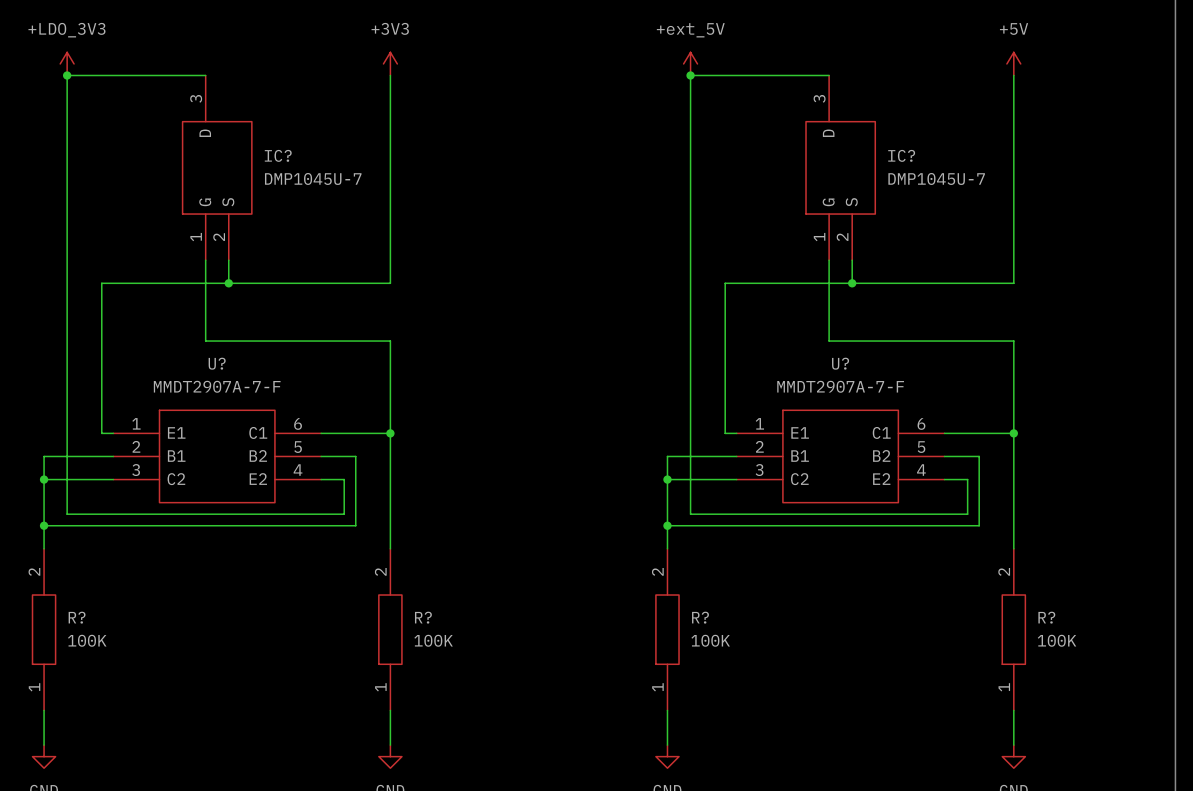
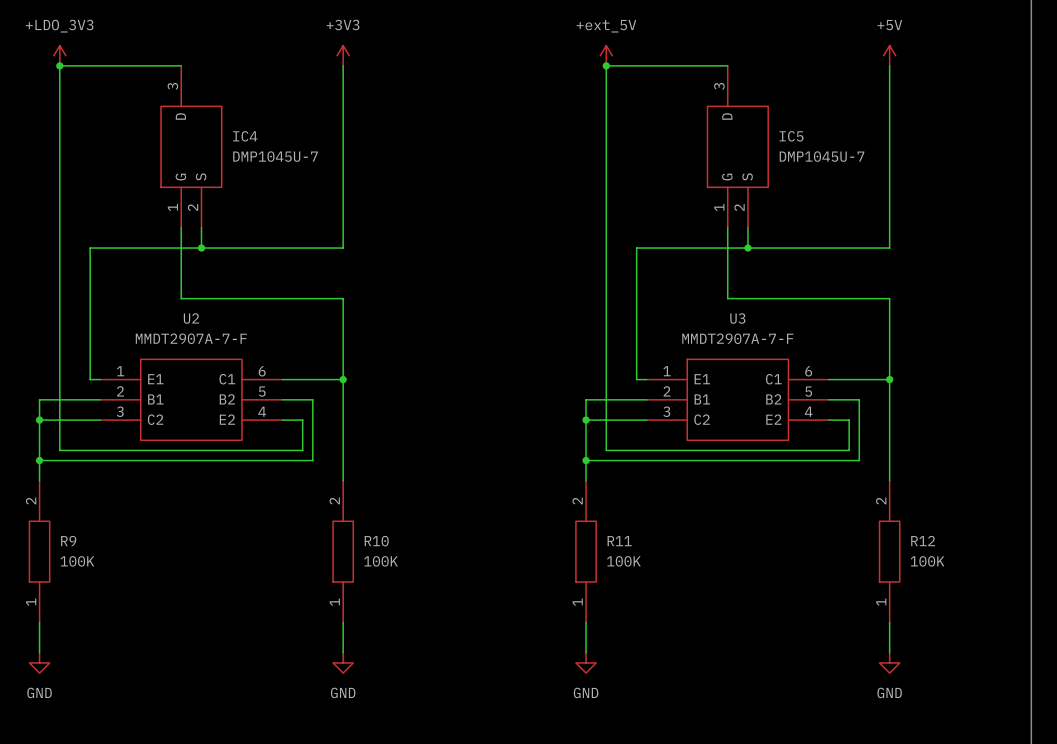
IC? name: IC? (278, 155) -> IC4 (245, 136)
IC? name: IC? (901, 155) -> IC5 (791, 136)
U? name: U? (217, 363) -> U2 (191, 318)
U? name: U? (840, 363) -> U3 (737, 318)
R? name: R? (77, 617) -> R9 (68, 541)
R? name: R? (423, 617) -> R10 (376, 541)
R? name: R? (700, 617) -> R11 (619, 541)
R? name: R? (1046, 617) -> R12 (923, 541)

